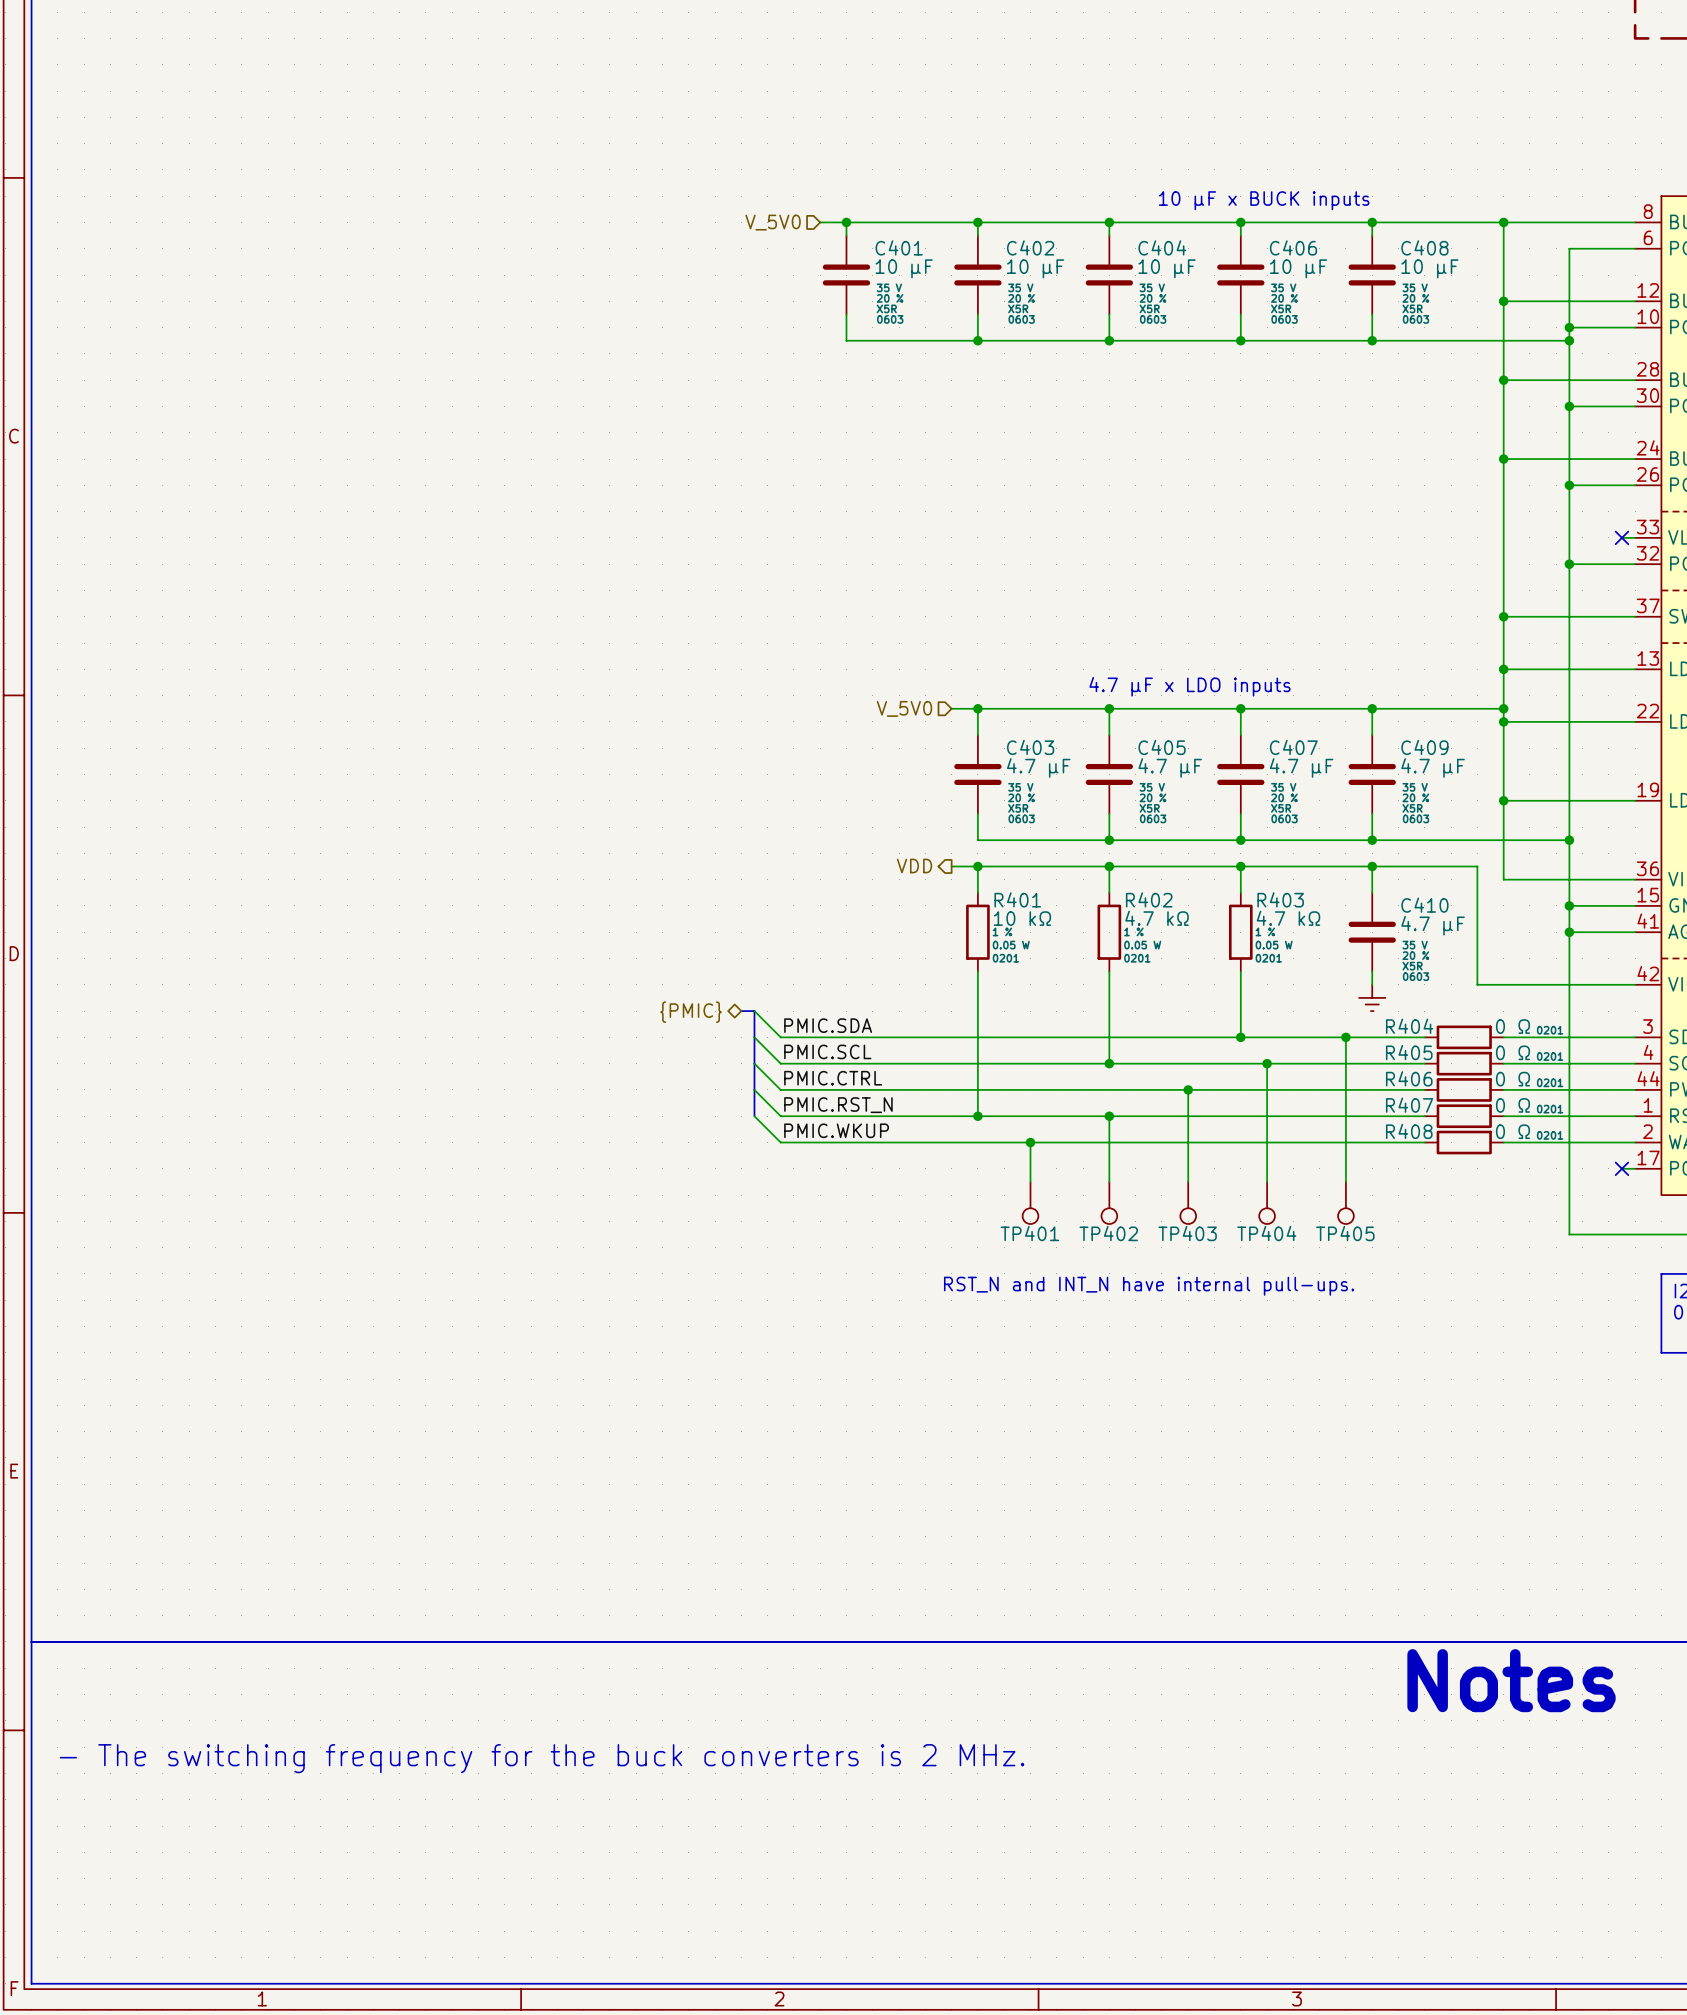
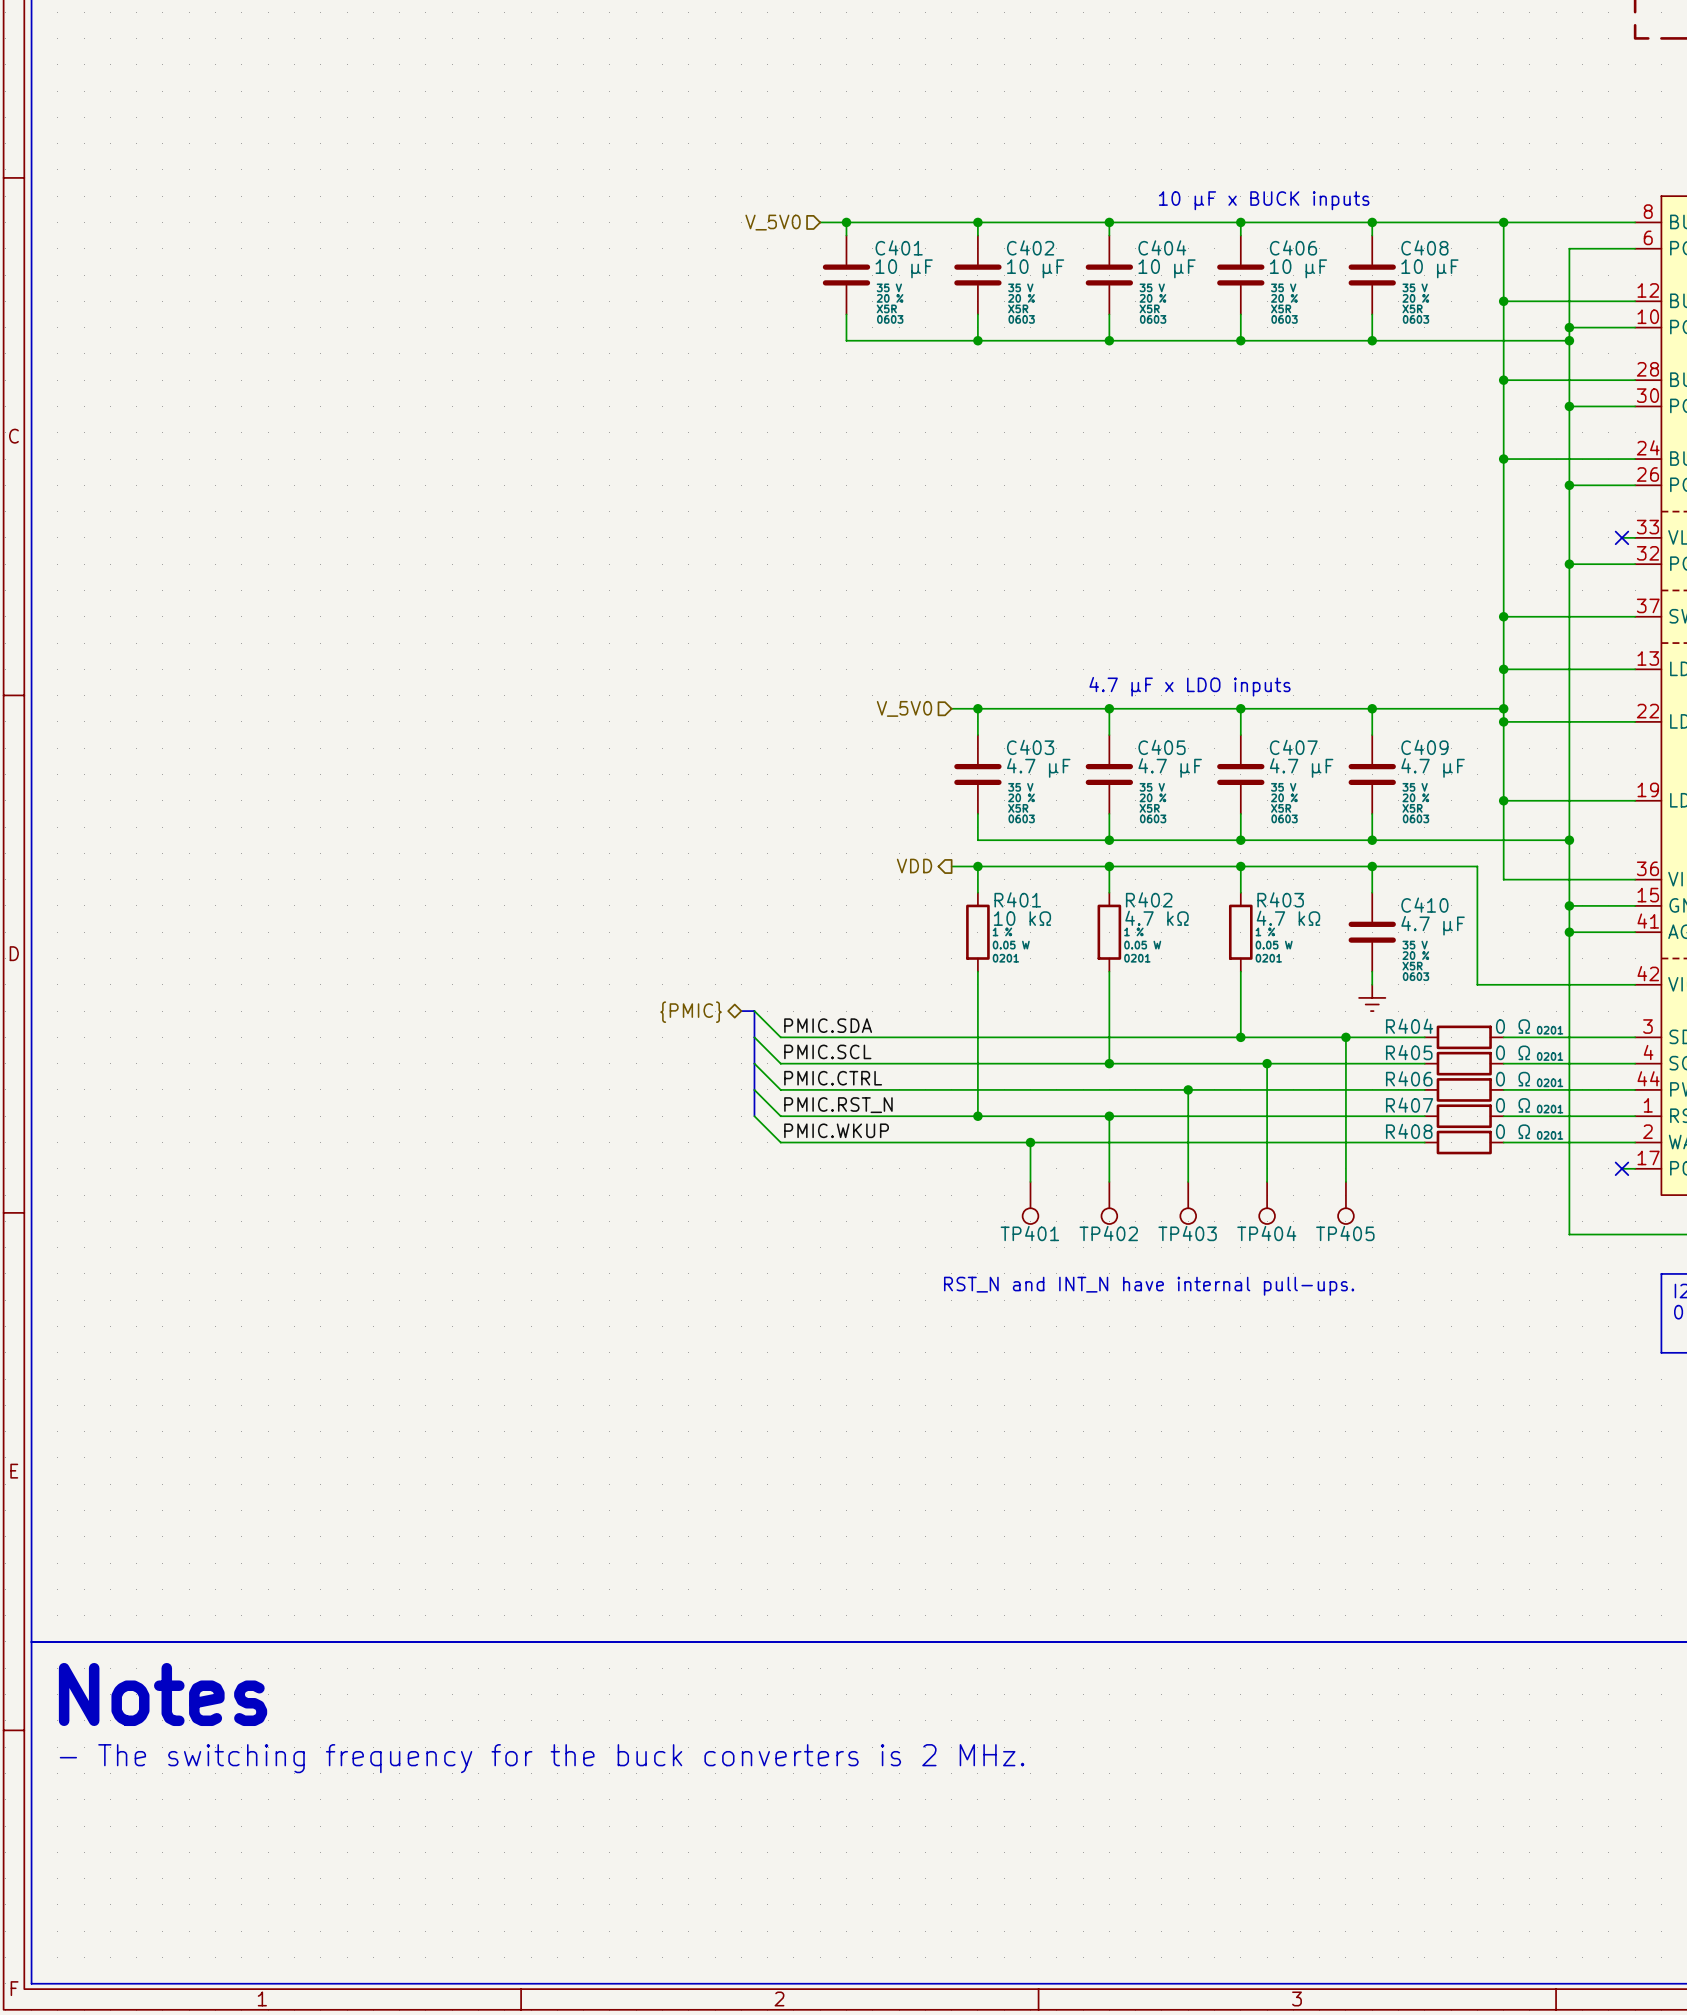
text: Notes (1511, 1680) -> none
text: none -> Notes (163, 1694)

